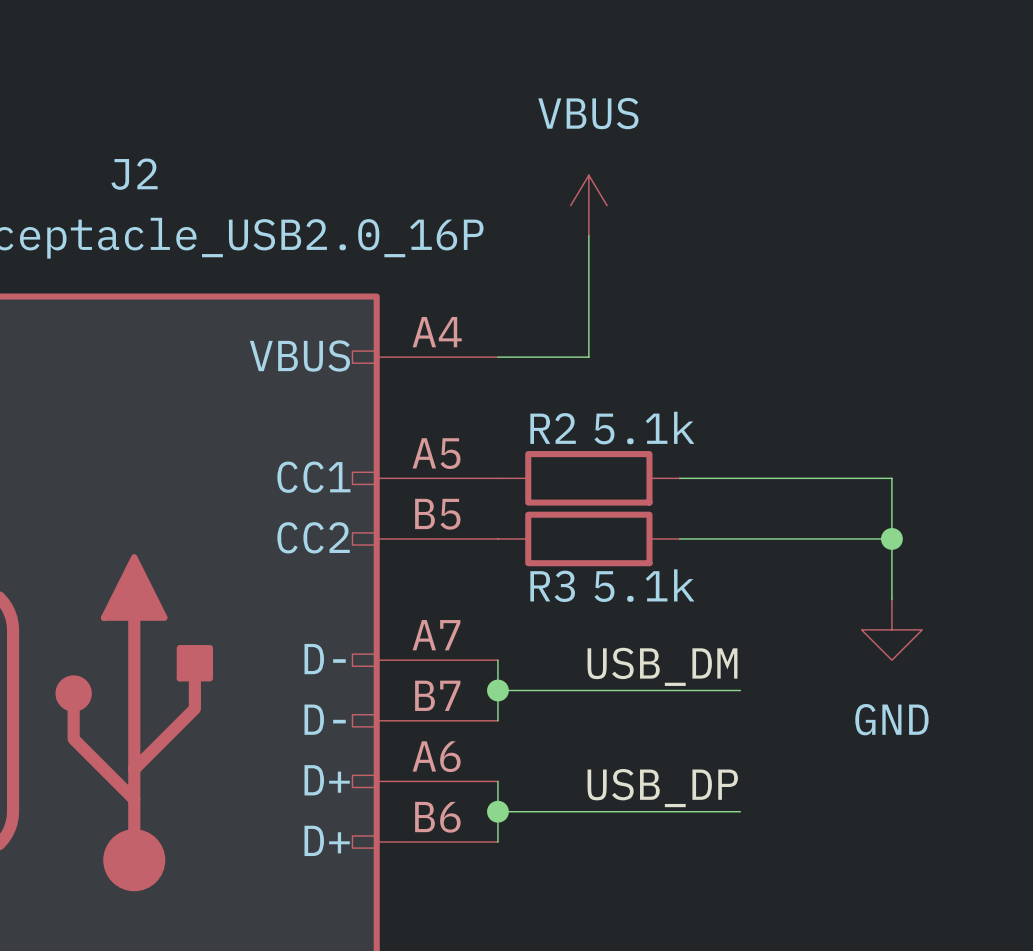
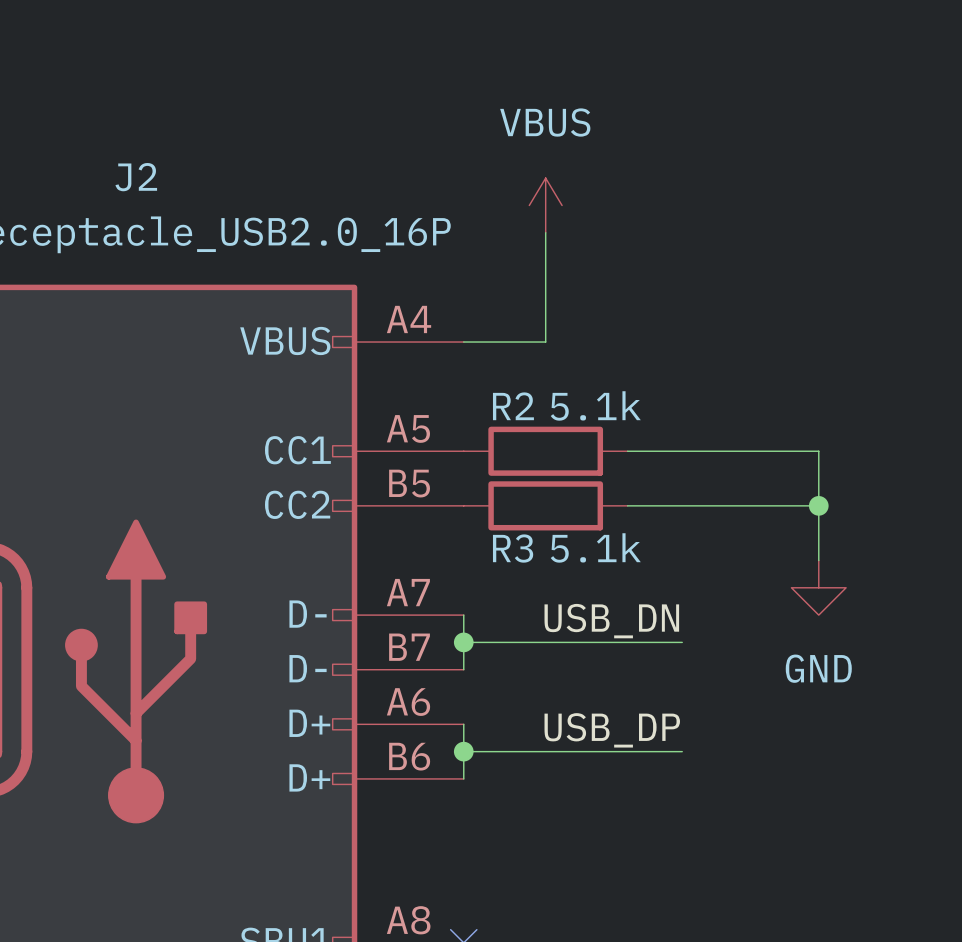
label: USB_DM (662, 666) -> USB_DN (611, 621)

